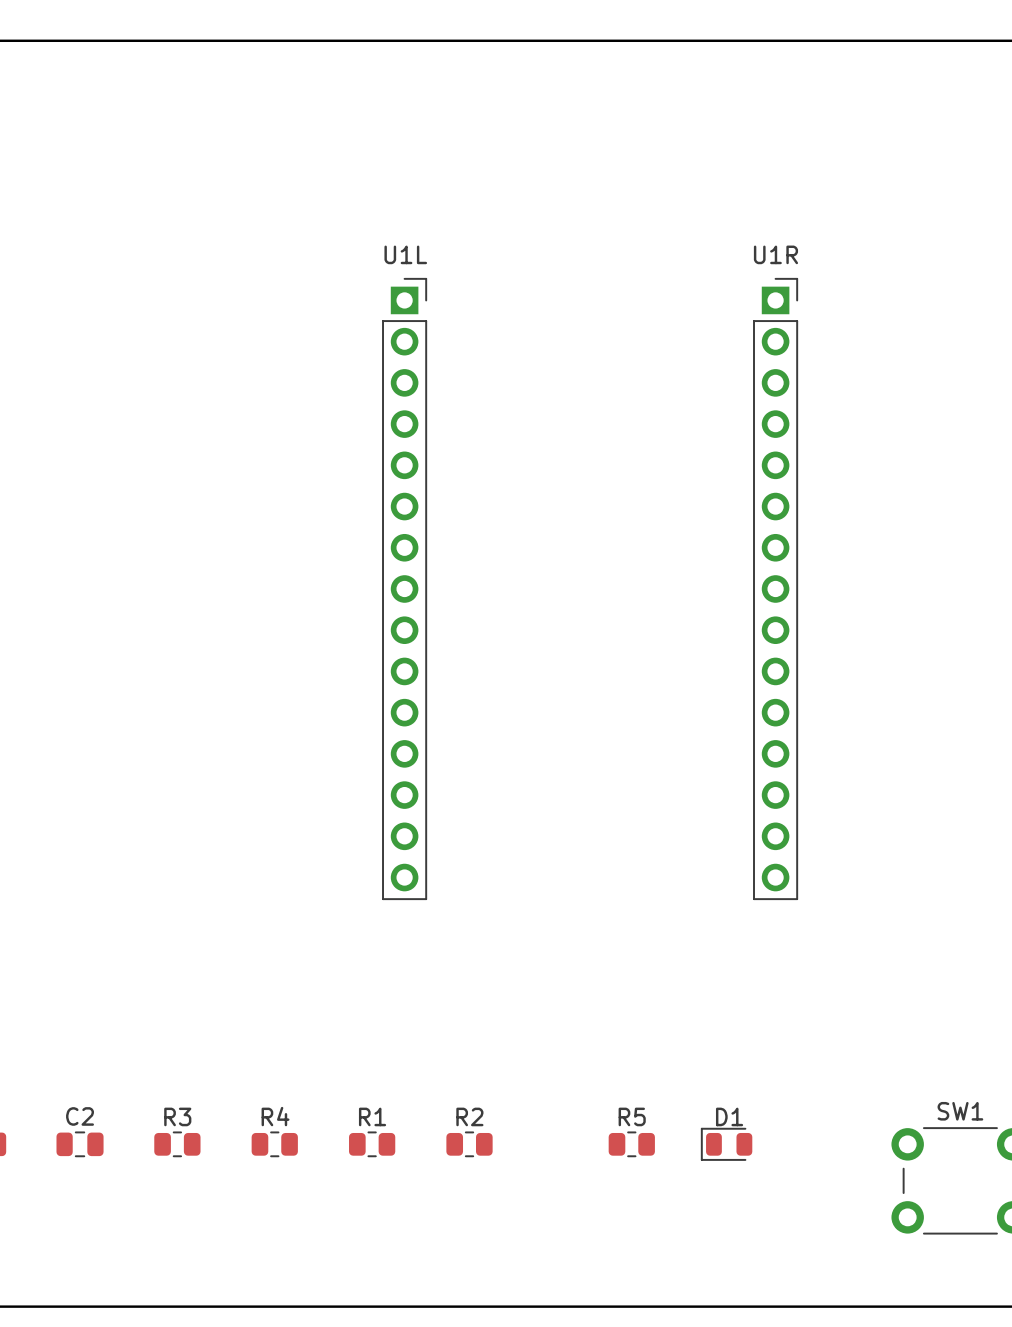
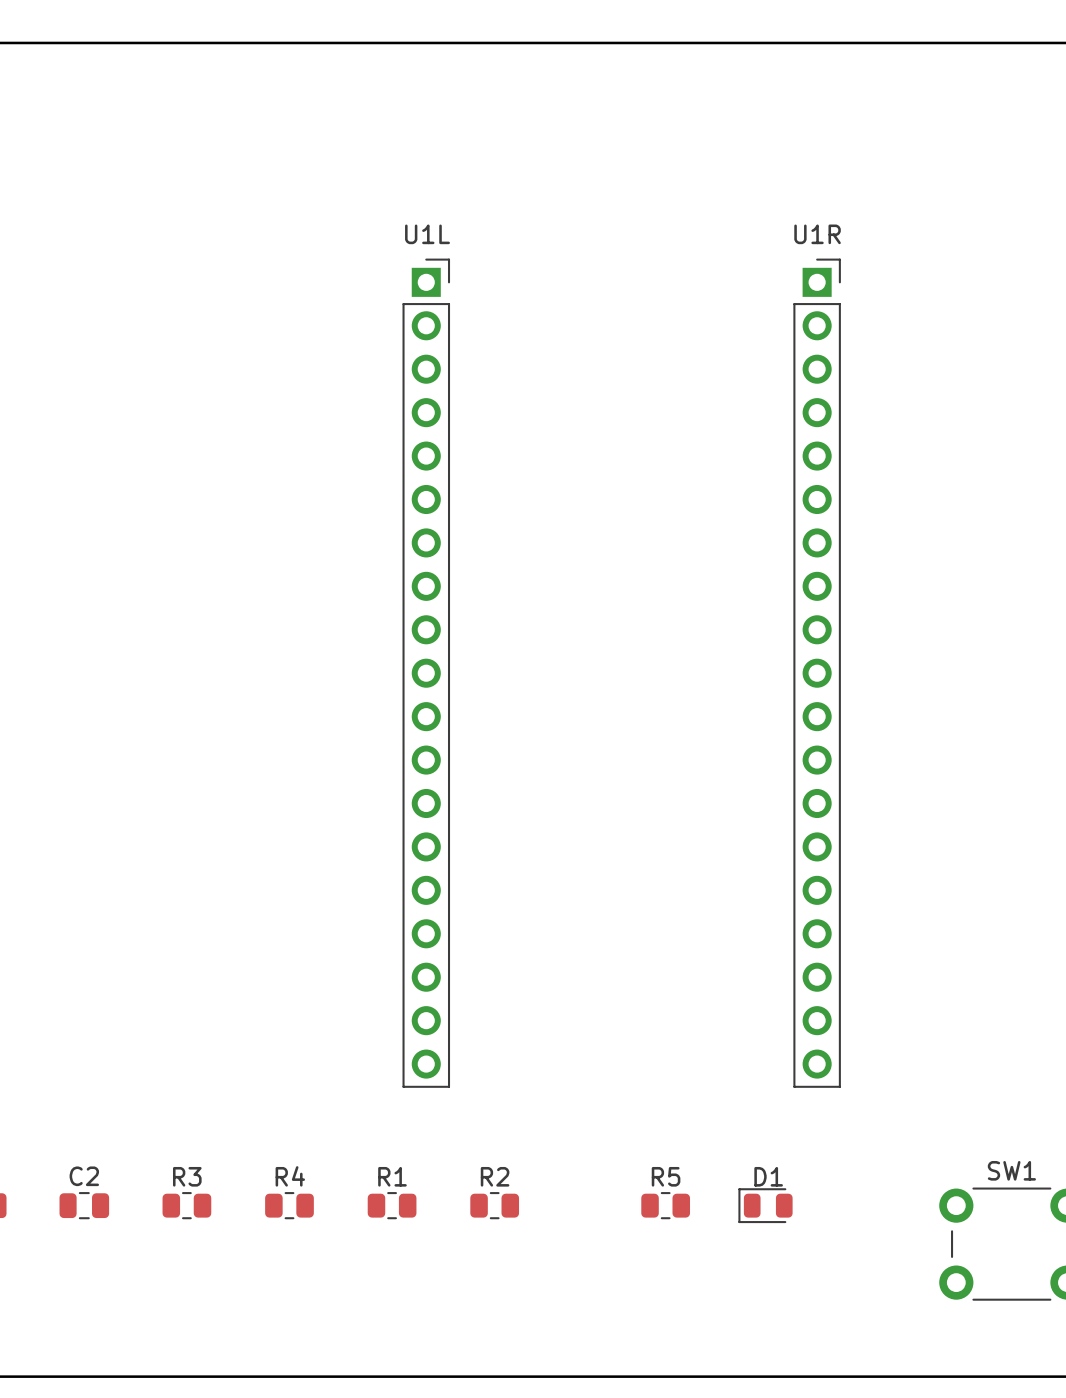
U1L name position: U1L (405, 254) -> U1L (427, 234)
U1R name position: U1R (775, 254) -> U1R (817, 234)
U1L footprint: [382, 277, 428, 901] -> [402, 258, 451, 1088]
U1R footprint: [753, 277, 799, 901] -> [793, 258, 841, 1088]

